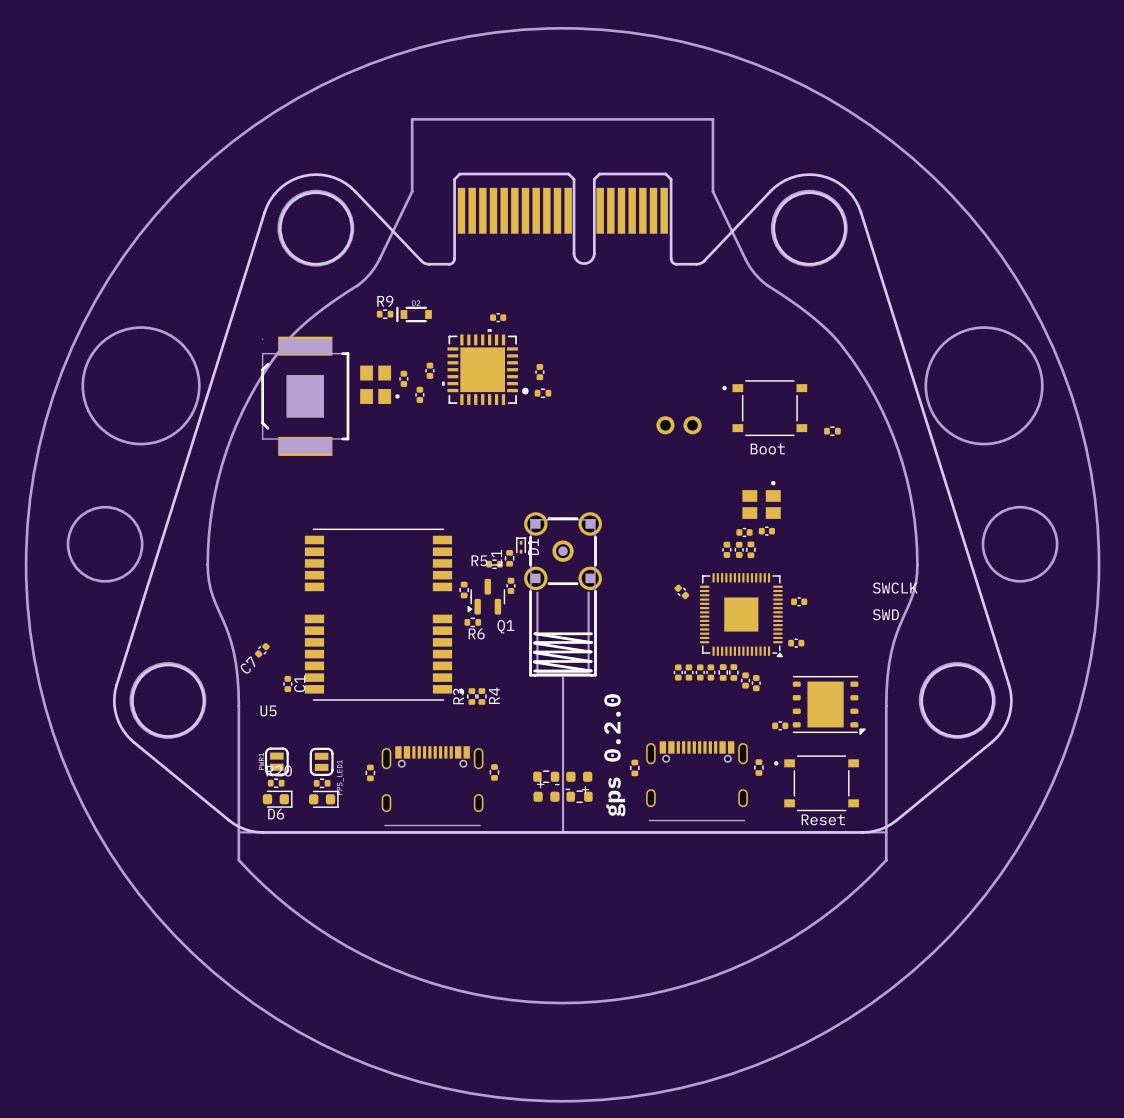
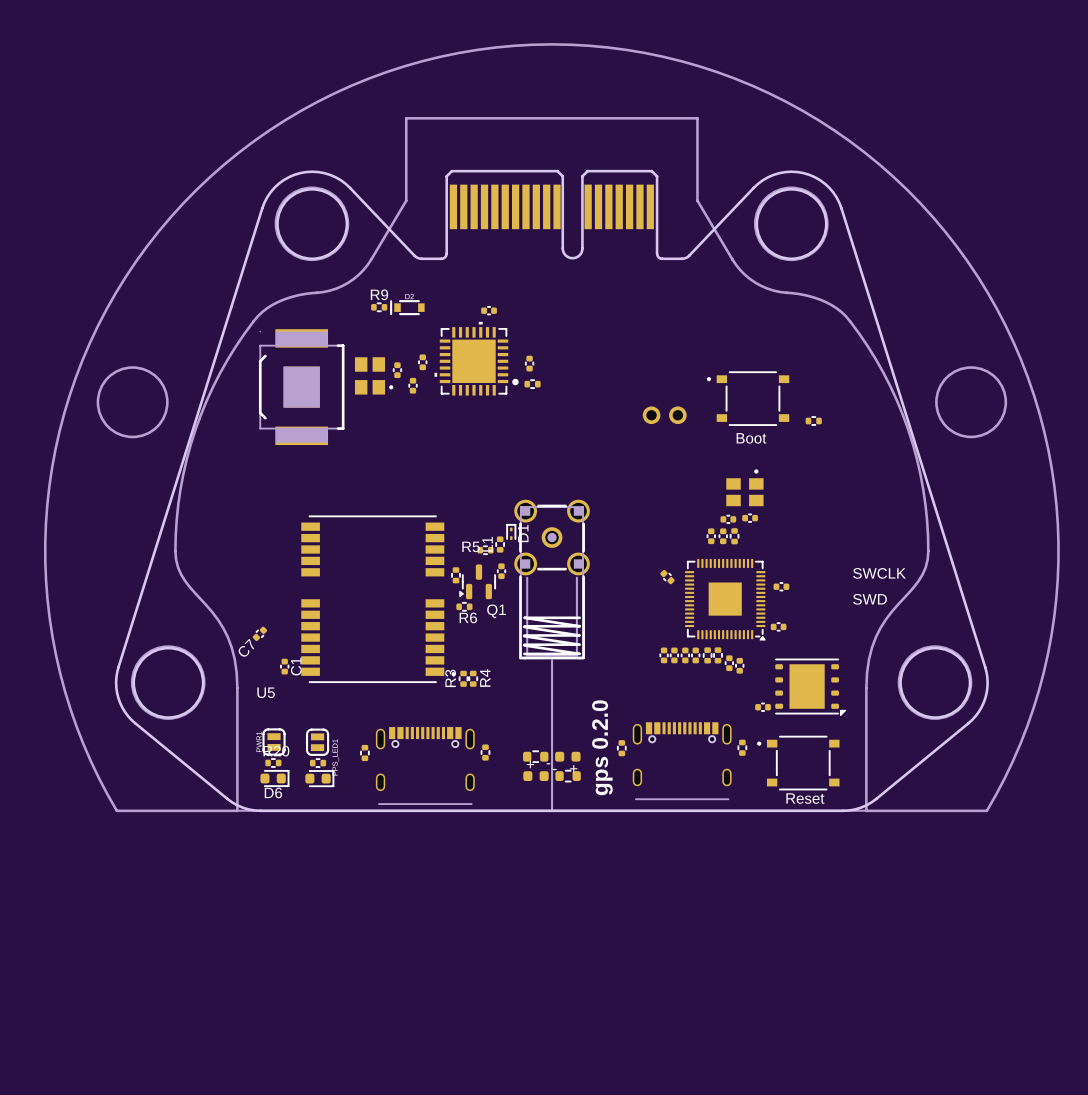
drawing: [24, 27, 1101, 1103] -> none
line: (412, 119) (412, 191) (377, 264) (362, 281) (311, 318) (281, 348) (264, 372) (243, 410) (231, 436) (218, 478) (210, 521) (208, 573) (212, 595) (231, 643) (237, 676) (238, 860) (276, 896) (331, 937) (393, 969) (459, 990) (527, 1001) (579, 1002) (648, 994) (699, 981) (747, 962) (793, 937) (835, 907) (886, 860) (887, 676) (893, 643) (914, 588) (917, 564) (912, 506) (898, 450) (875, 397) (840, 344) (809, 314) (762, 281) (748, 264) (712, 191) (712, 119) (412, 119) -> (406, 118) (406, 200) (371, 259) (358, 274) (342, 285) (329, 290) (287, 298) (272, 305) (257, 316) (235, 346) (213, 386) (200, 415) (186, 459) (178, 504) (176, 559) (185, 580) (223, 627) (234, 659) (237, 688) (237, 810) (116, 810) (90, 761) (64, 690) (52, 635) (45, 561) (49, 486) (64, 413) (90, 342) (115, 292) (147, 246) (196, 189) (238, 152) (300, 110) (351, 85) (422, 61) (495, 47) (551, 44) (626, 49) (681, 61) (752, 85) (802, 110) (864, 152) (920, 203) (956, 246) (997, 309) (1027, 377) (1044, 431) (1056, 505) (1058, 561) (1051, 635) (1038, 690) (1020, 743) (986, 810) (866, 810) (866, 688) (869, 659) (880, 627) (918, 580) (927, 559) (925, 504) (916, 459) (908, 429) (890, 386) (867, 346) (846, 316) (831, 305) (815, 298) (773, 290) (761, 285) (744, 274) (732, 259) (697, 200) (697, 118) (406, 118)
drawing: none -> [96, 366, 169, 439]
drawing: none -> [935, 366, 1008, 439]

